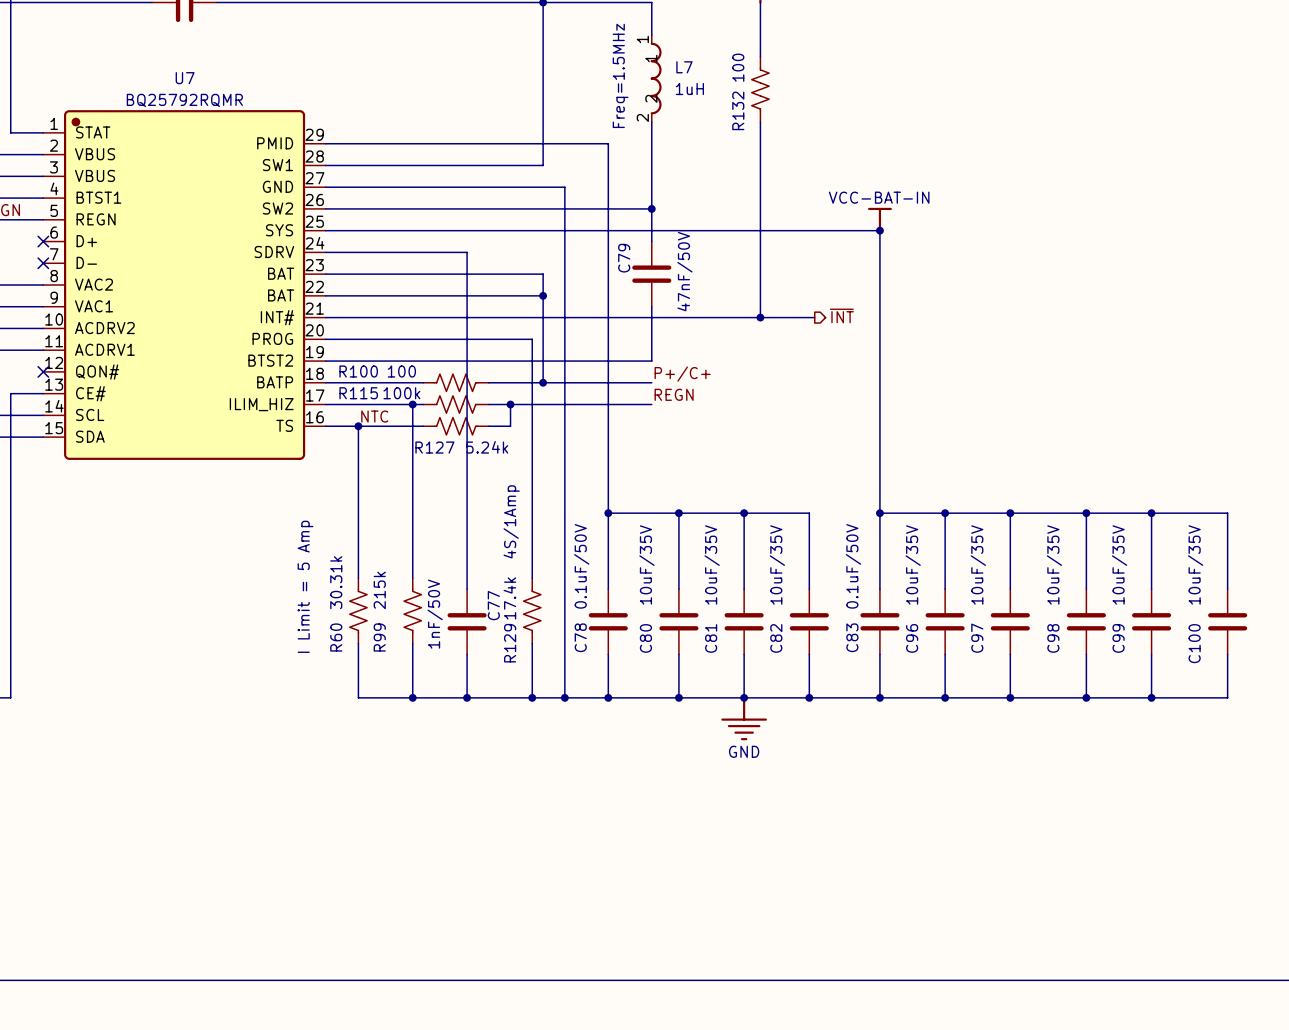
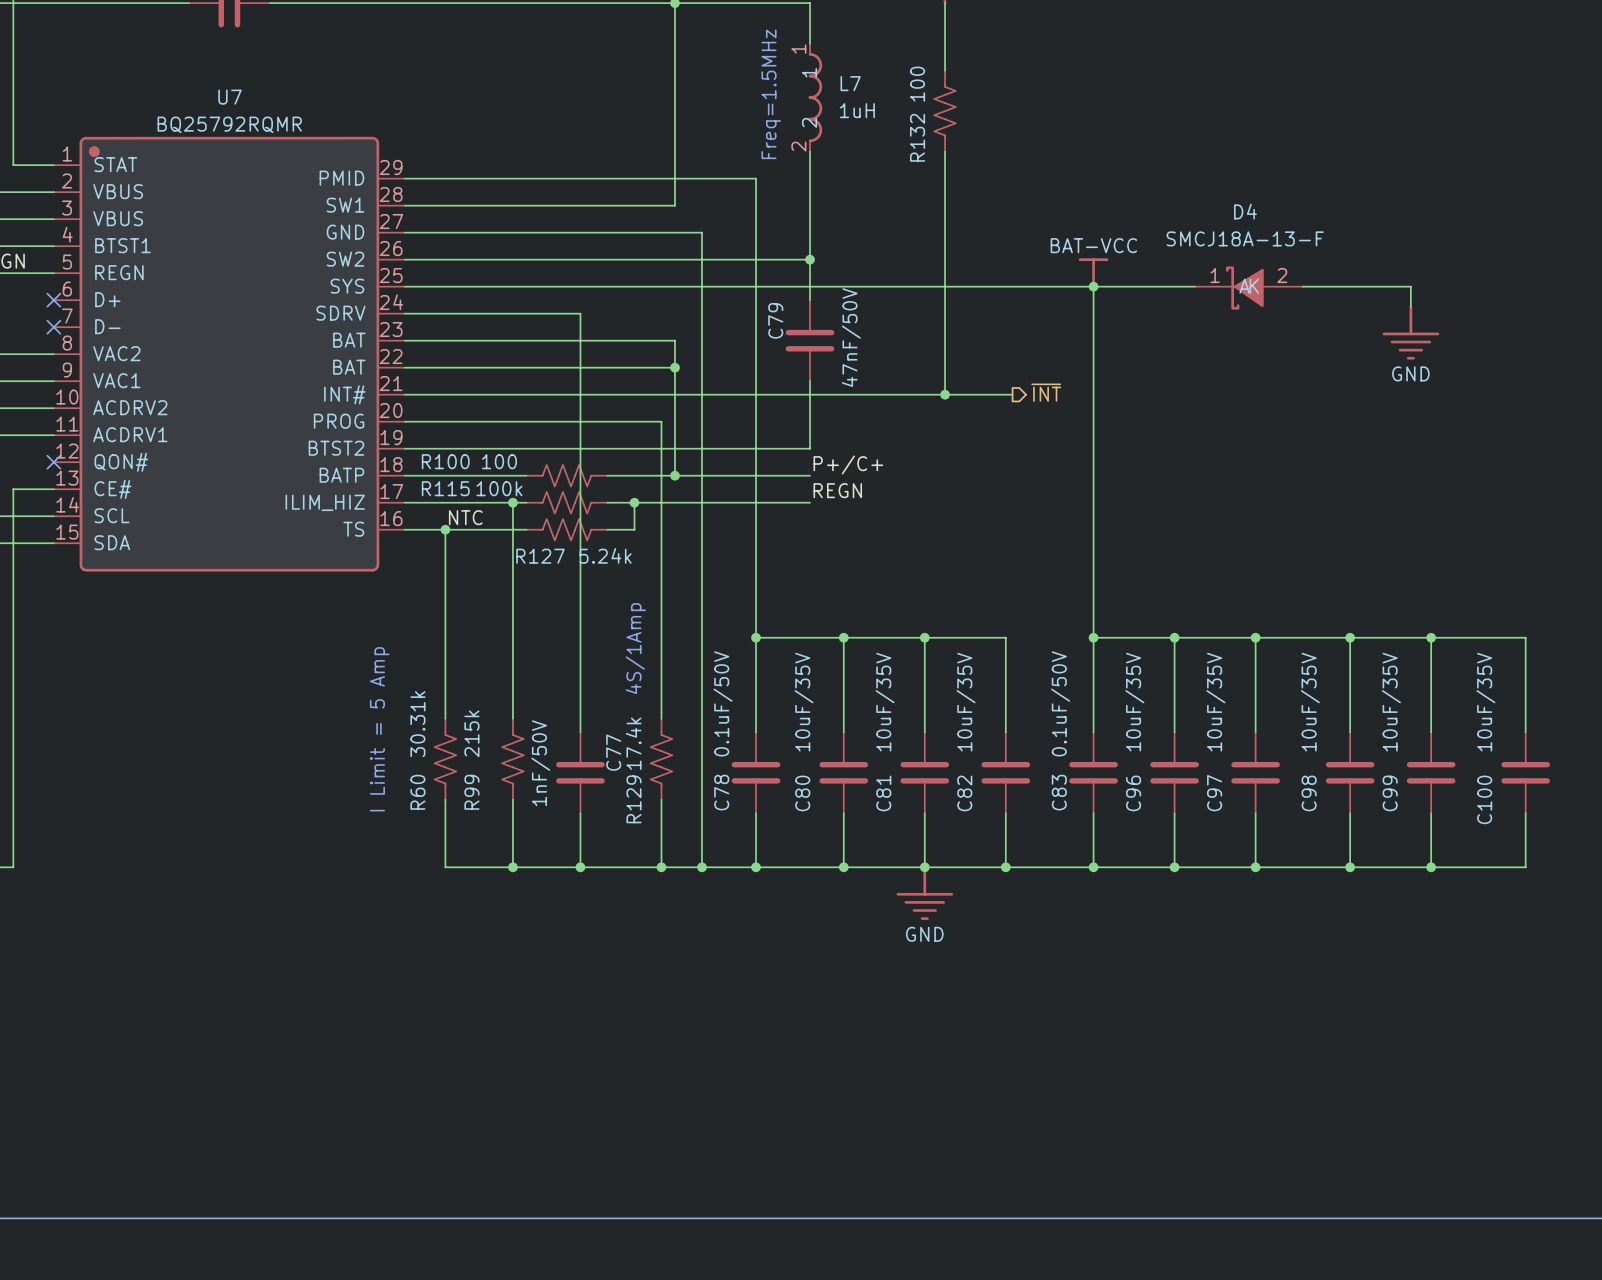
power symbol: VCC-BAT-IN (879, 219) -> BAT-VCC (1093, 273)
wire: none -> (1093, 286) (1194, 286)
wire: none -> (1302, 286) (1410, 286) (1410, 306)
D4: none -> SMCJ18A-13-F (1248, 288)
power symbol: none -> GND (1410, 332)

